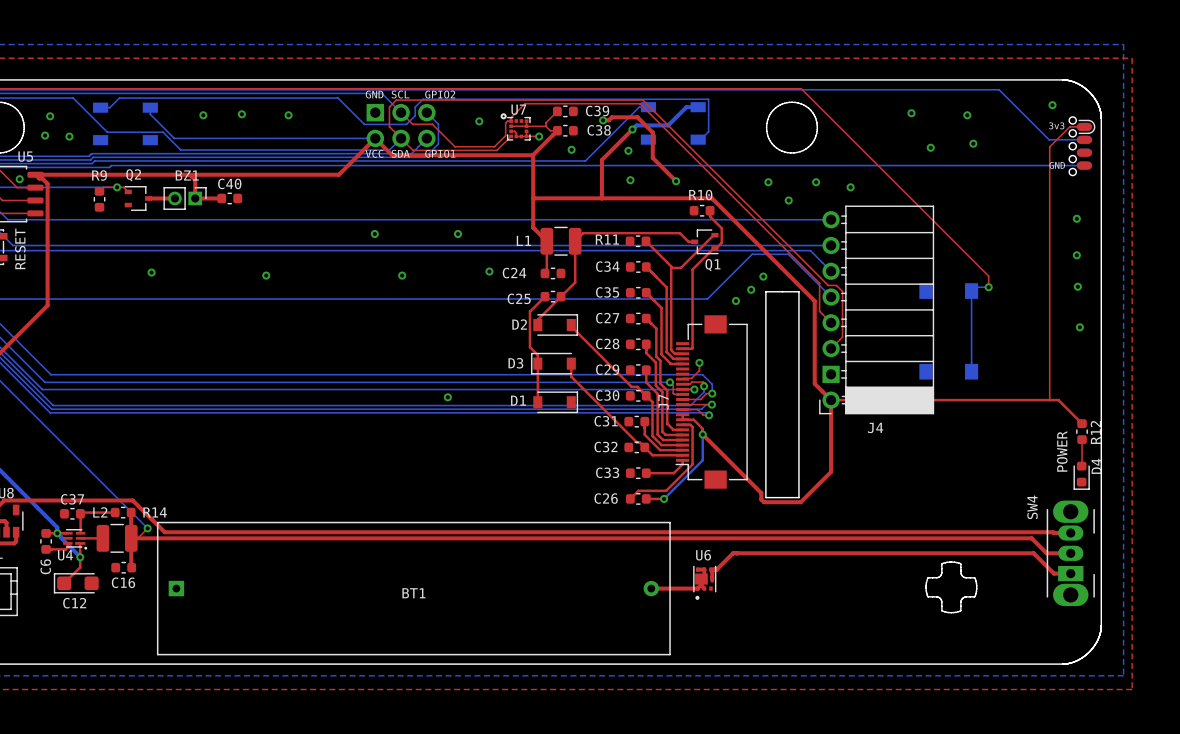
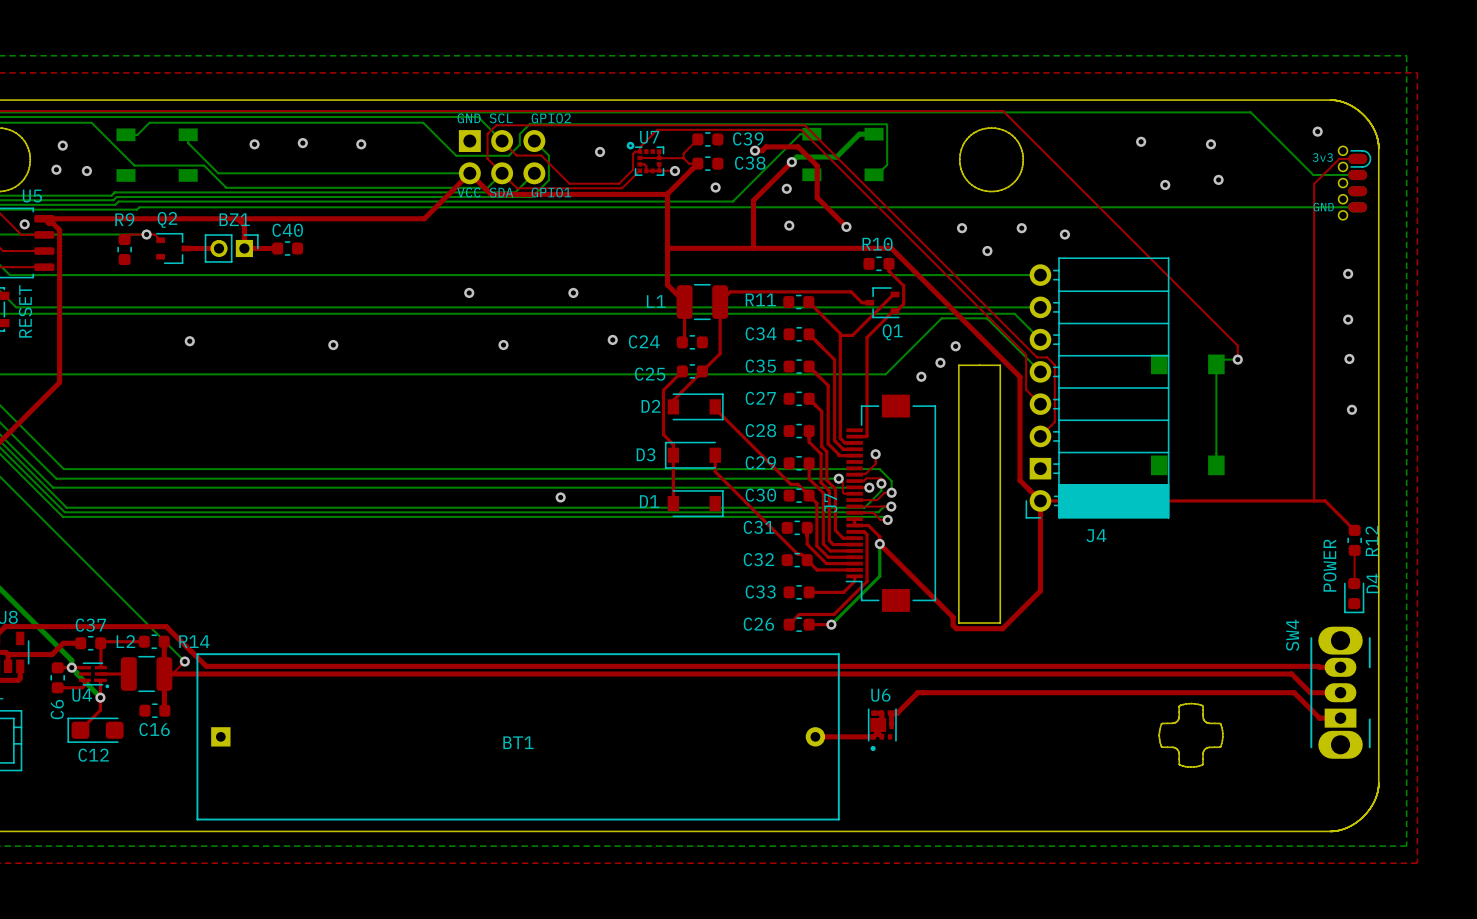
top track: none -> (80, 643) (63, 643) (52, 654) (8, 654)

